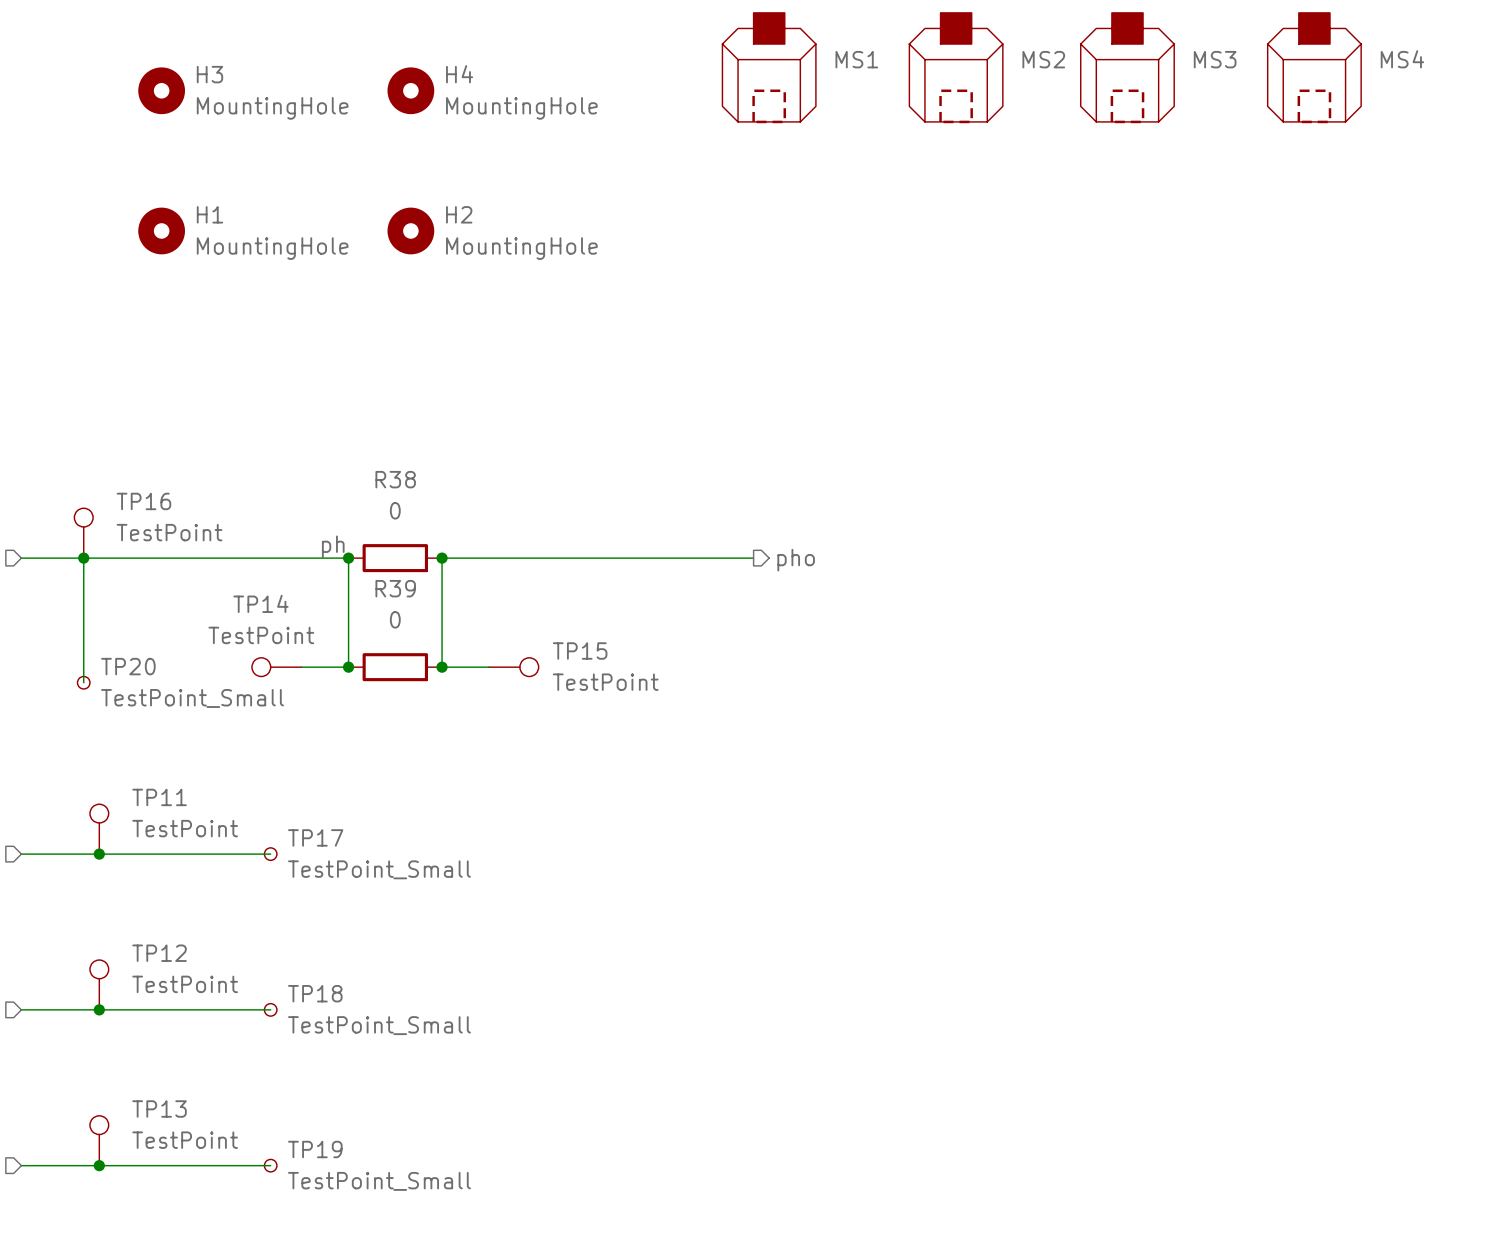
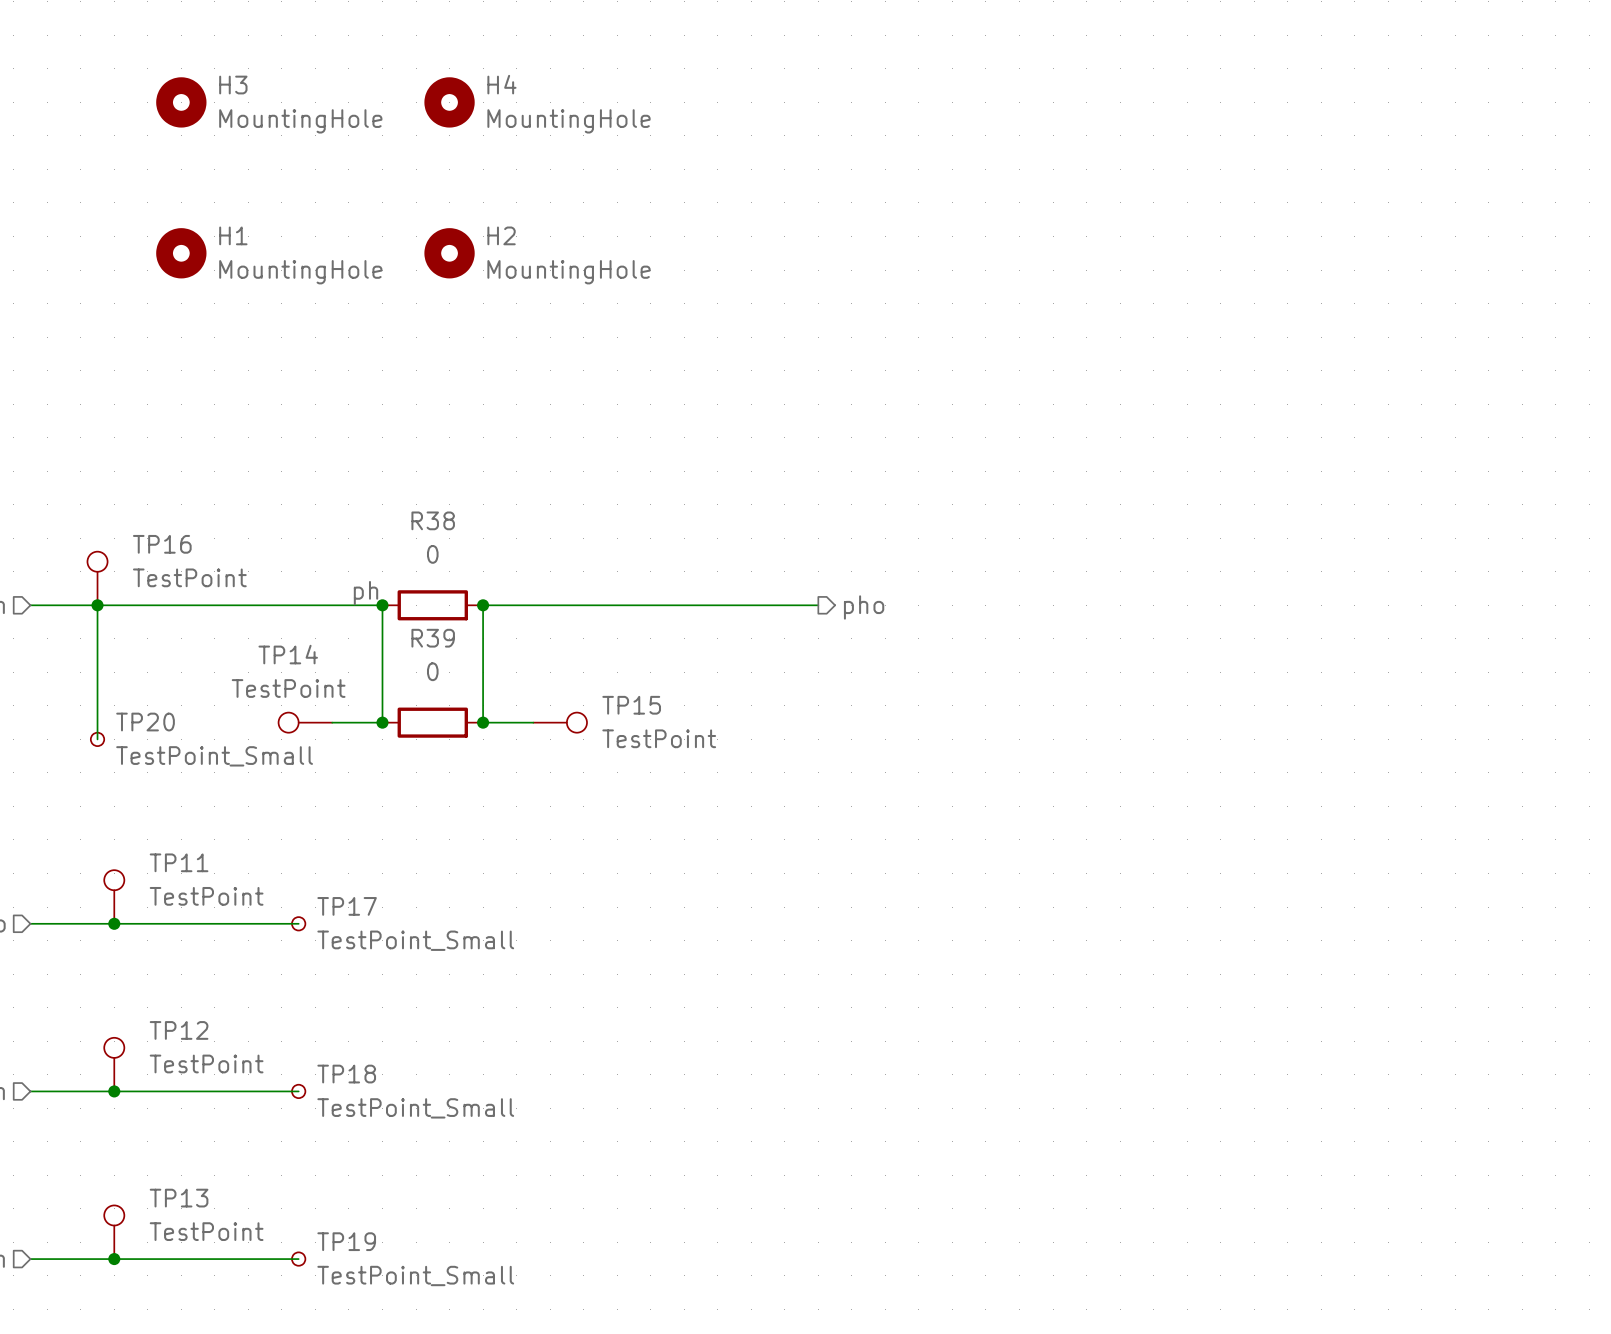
MS1: (769, 68) -> none
MS2: (956, 68) -> none
MS3: (1127, 68) -> none
MS4: (1314, 68) -> none

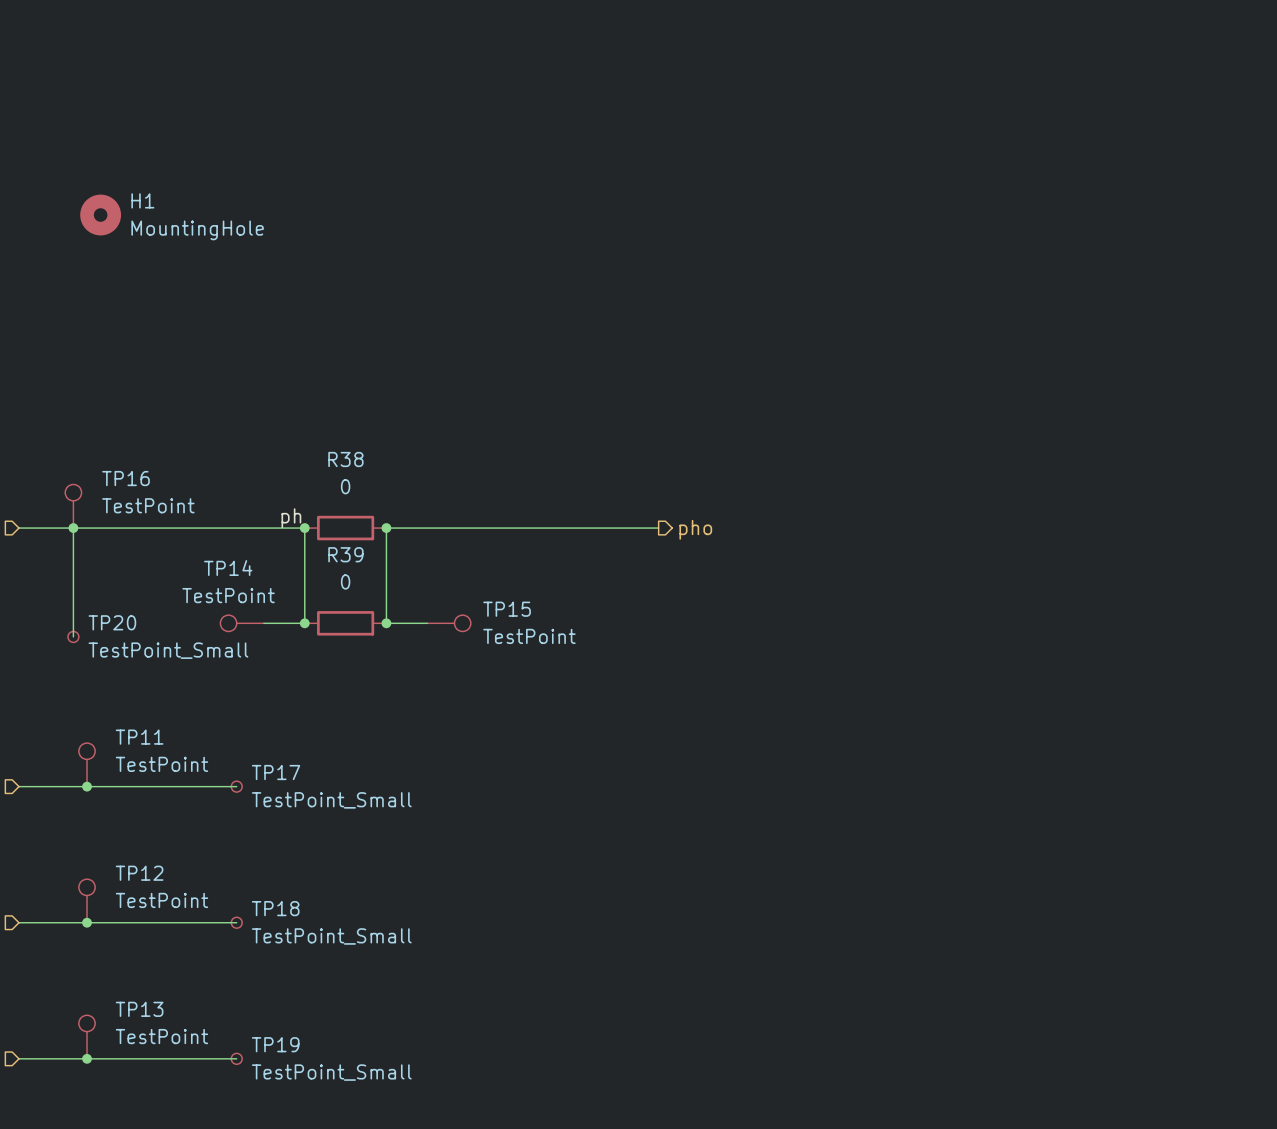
H3: MountingHole (181, 102) -> none
H4: MountingHole (449, 102) -> none
H1 position: (181, 253) -> (100, 215)
H2: MountingHole (449, 253) -> none

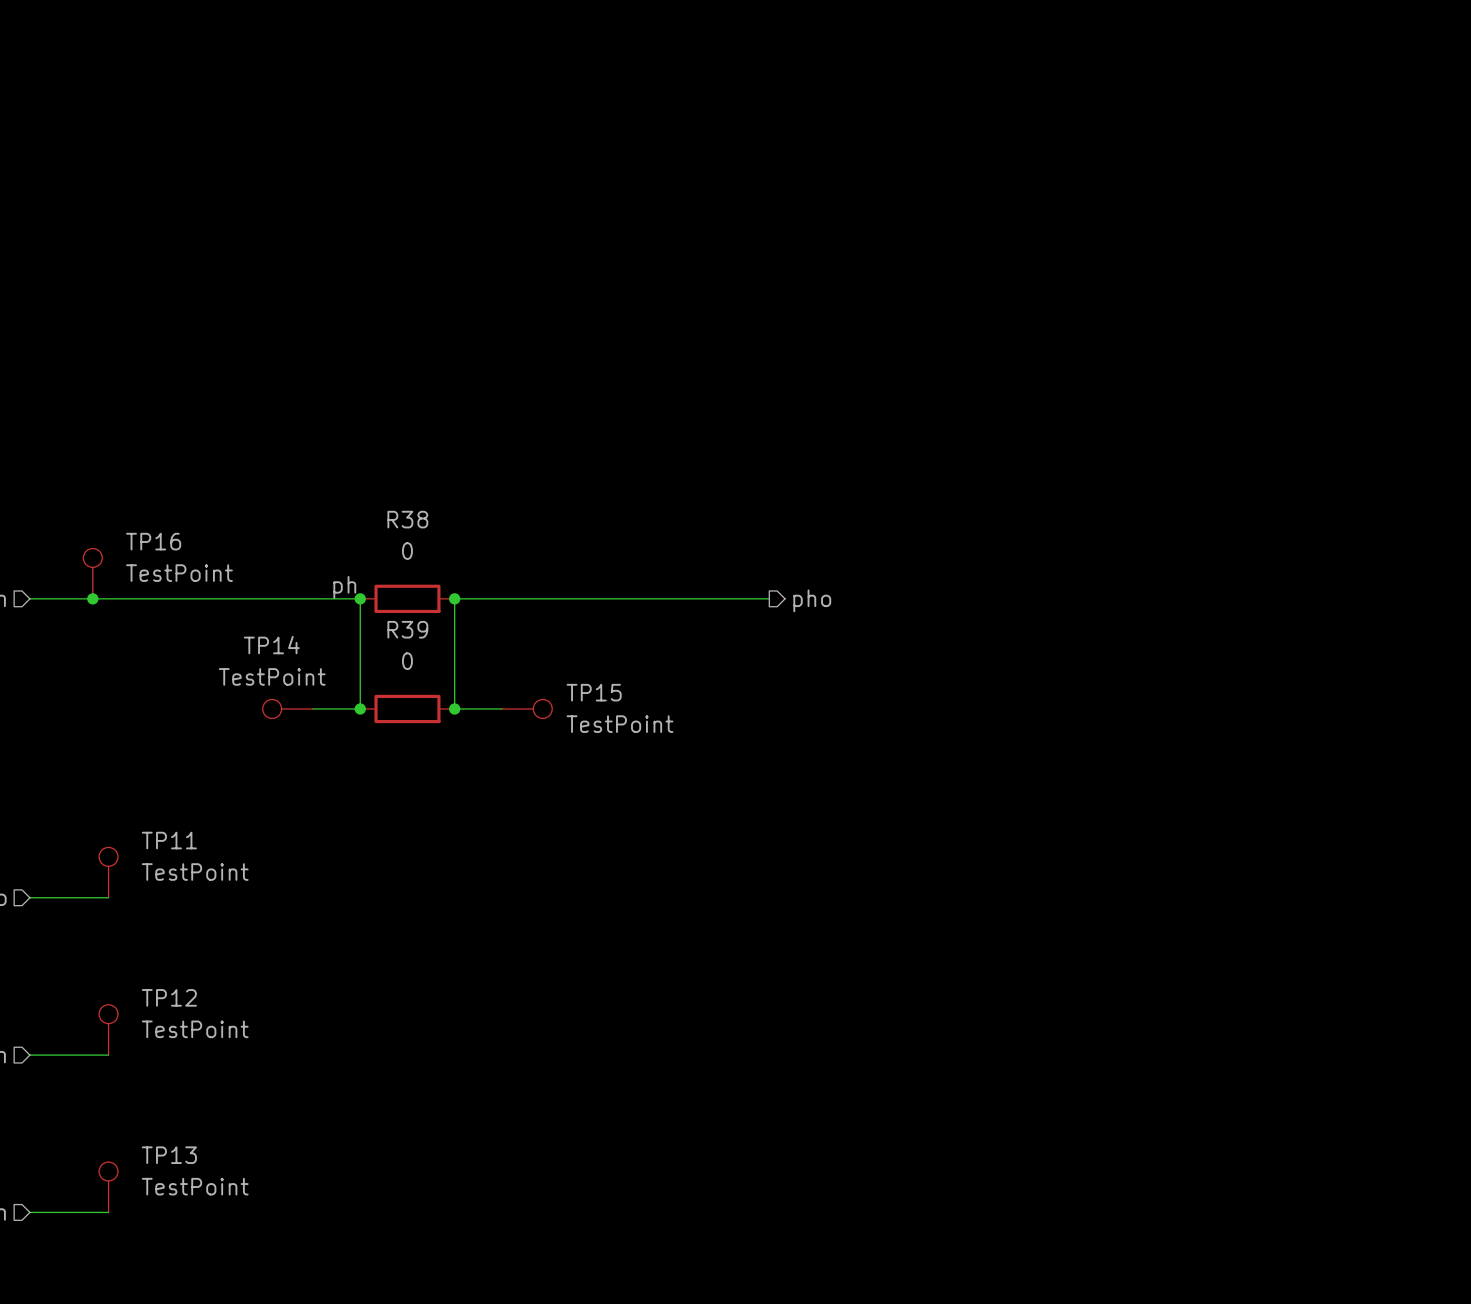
H1: MountingHole (100, 215) -> none
wire: (73, 528) (73, 636) -> none
TP20: TestPoint_Small (73, 636) -> none
wire: (87, 786) (236, 786) -> none
junction: (87, 786) -> none
TP17: TestPoint_Small (236, 786) -> none
wire: (87, 922) (236, 922) -> none
junction: (87, 922) -> none
TP18: TestPoint_Small (236, 922) -> none
wire: (87, 1058) (236, 1058) -> none
junction: (87, 1058) -> none
TP19: TestPoint_Small (236, 1058) -> none

